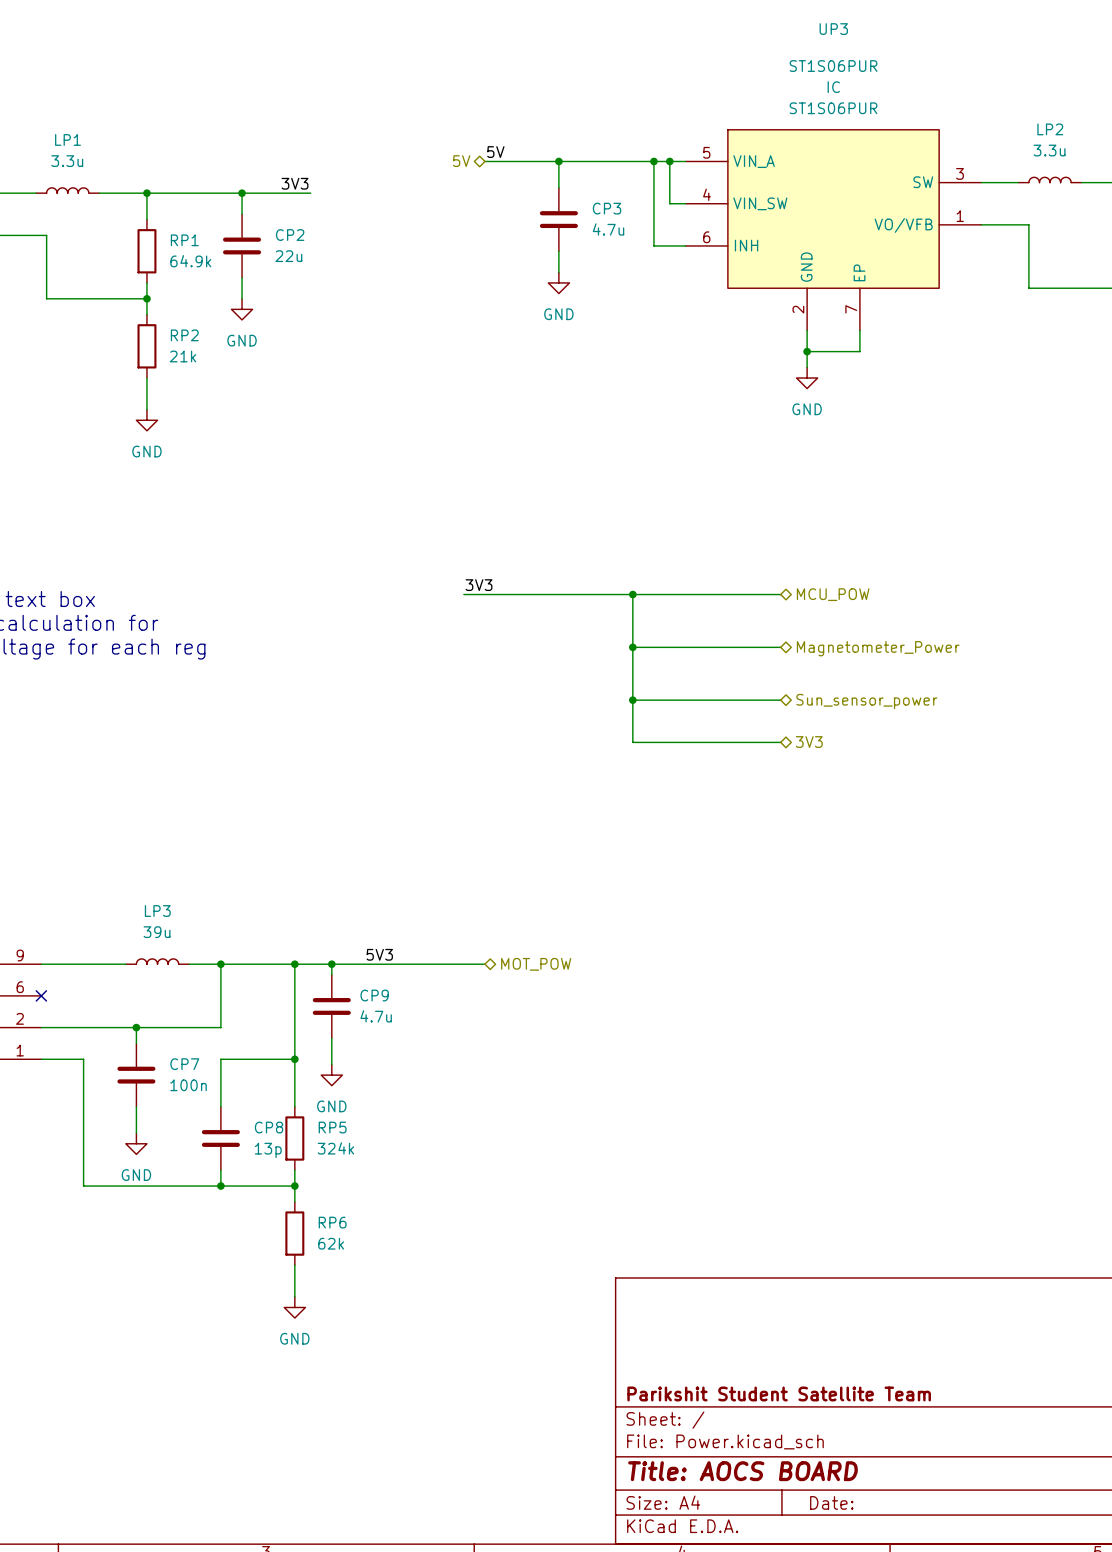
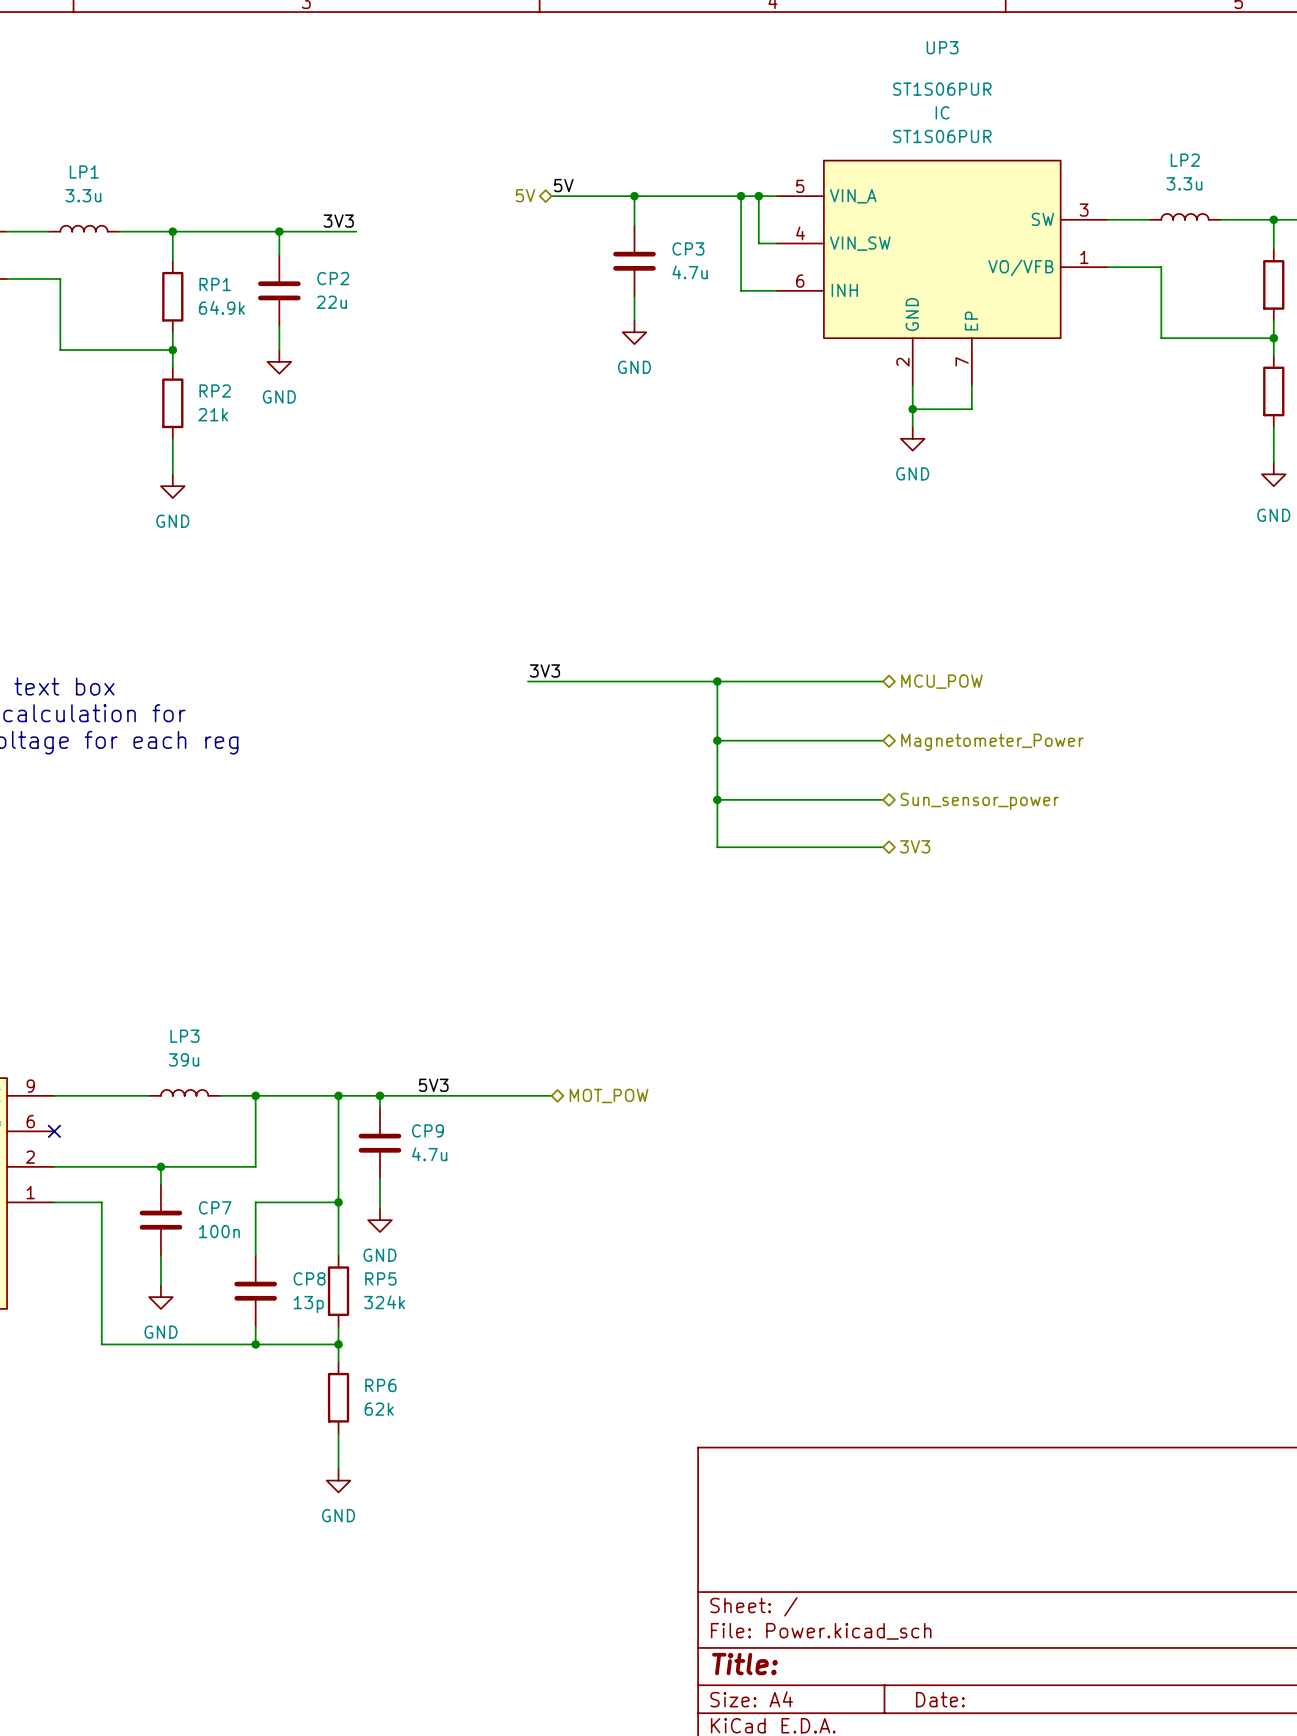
title block: Parikshit Student Satellite Team (779, 1393) -> none
title block: Title: AOCS BOARD (743, 1471) -> Title: (744, 1664)

